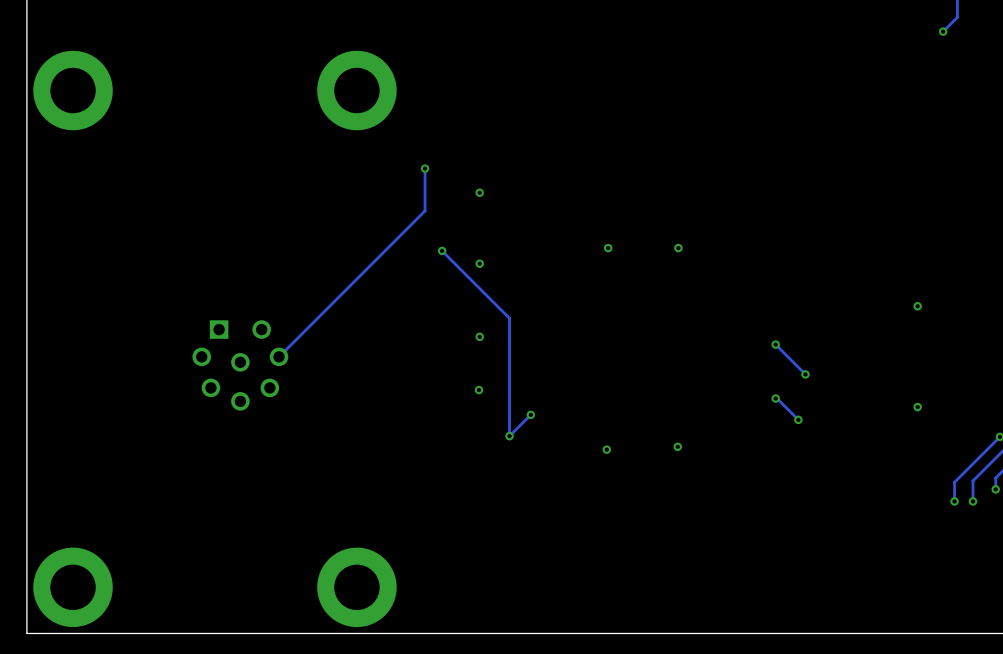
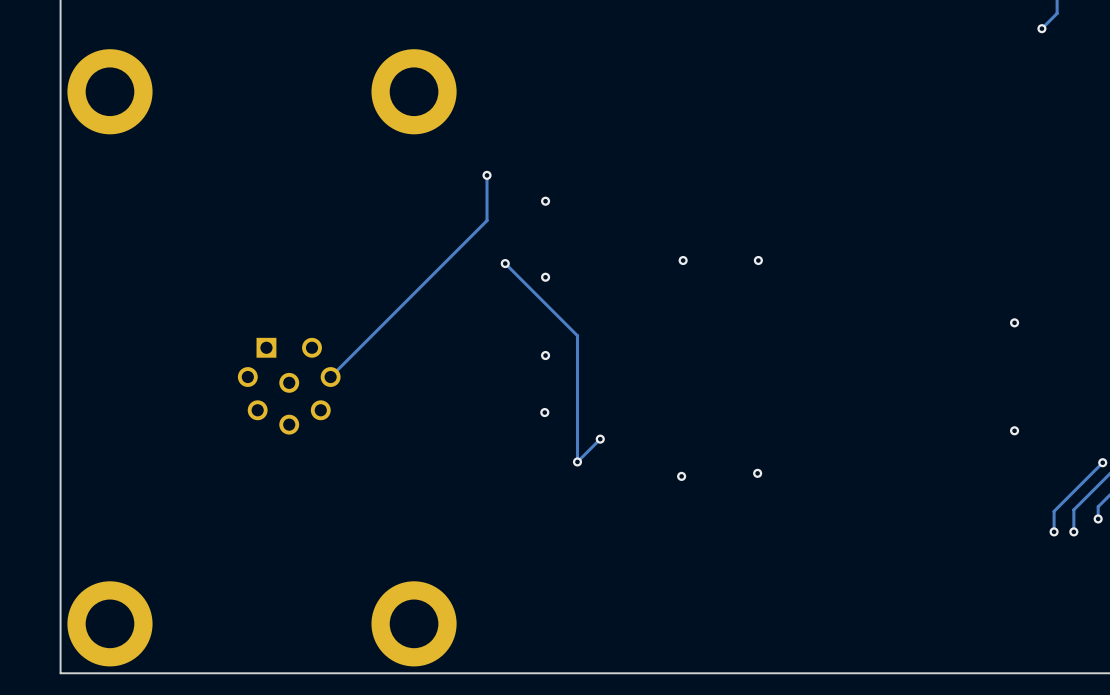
track: (775, 344) (805, 374) -> none
via: (775, 344) -> none
via: (805, 374) -> none
track: (775, 398) (798, 419) -> none
via: (775, 398) -> none
via: (798, 419) -> none

